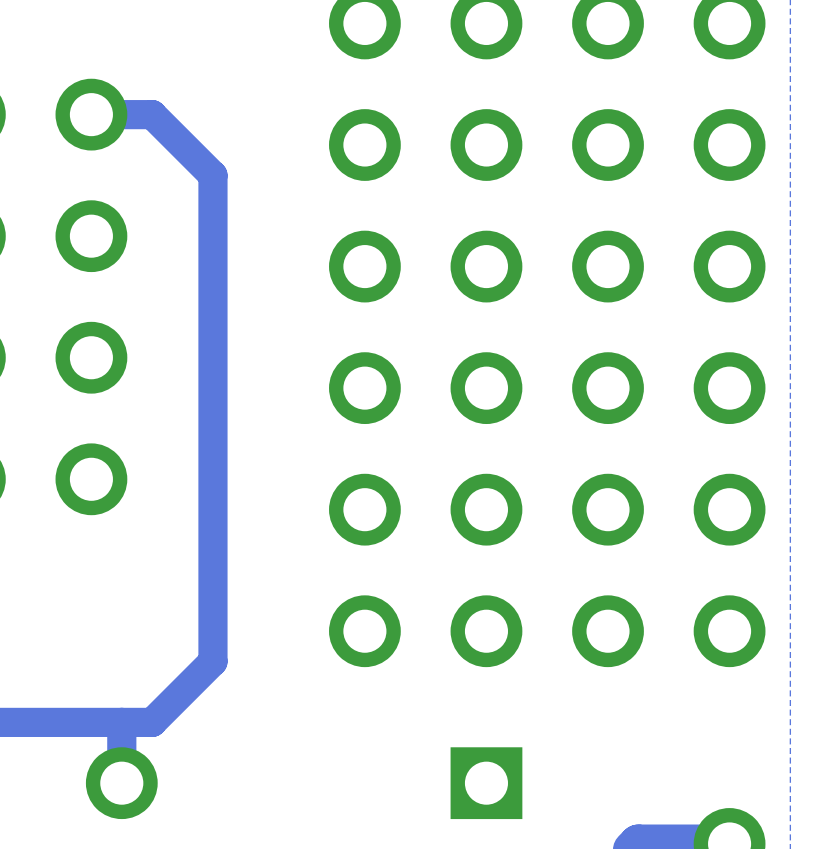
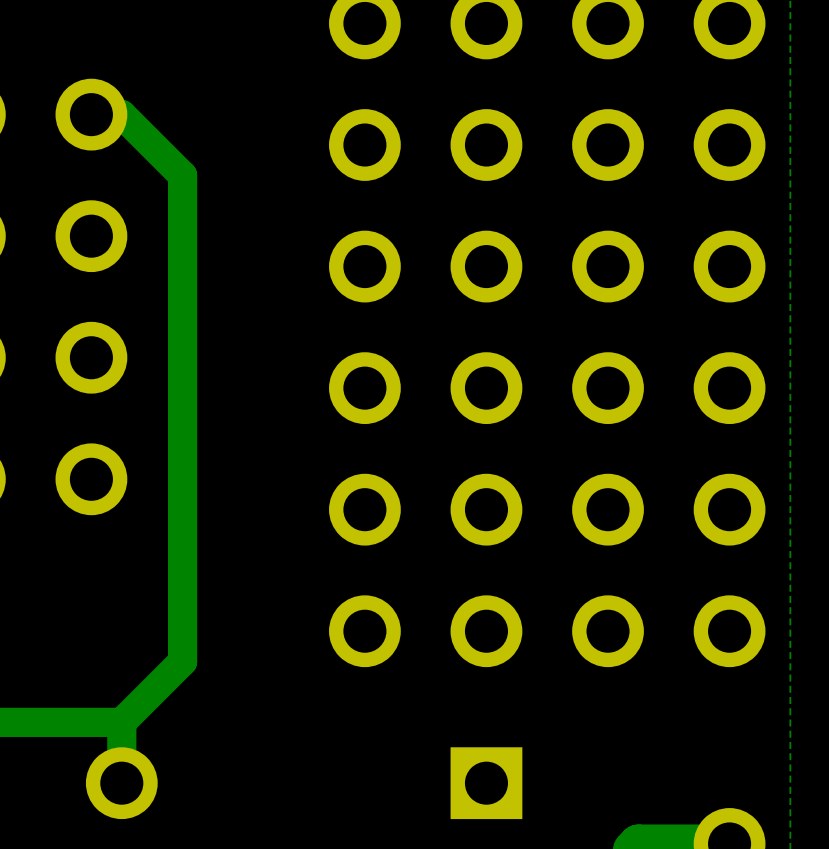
track: (121, 114) (152, 114) (212, 175) (212, 661) (152, 722) (121, 722) -> (121, 114) (182, 175) (182, 661) (121, 722)

